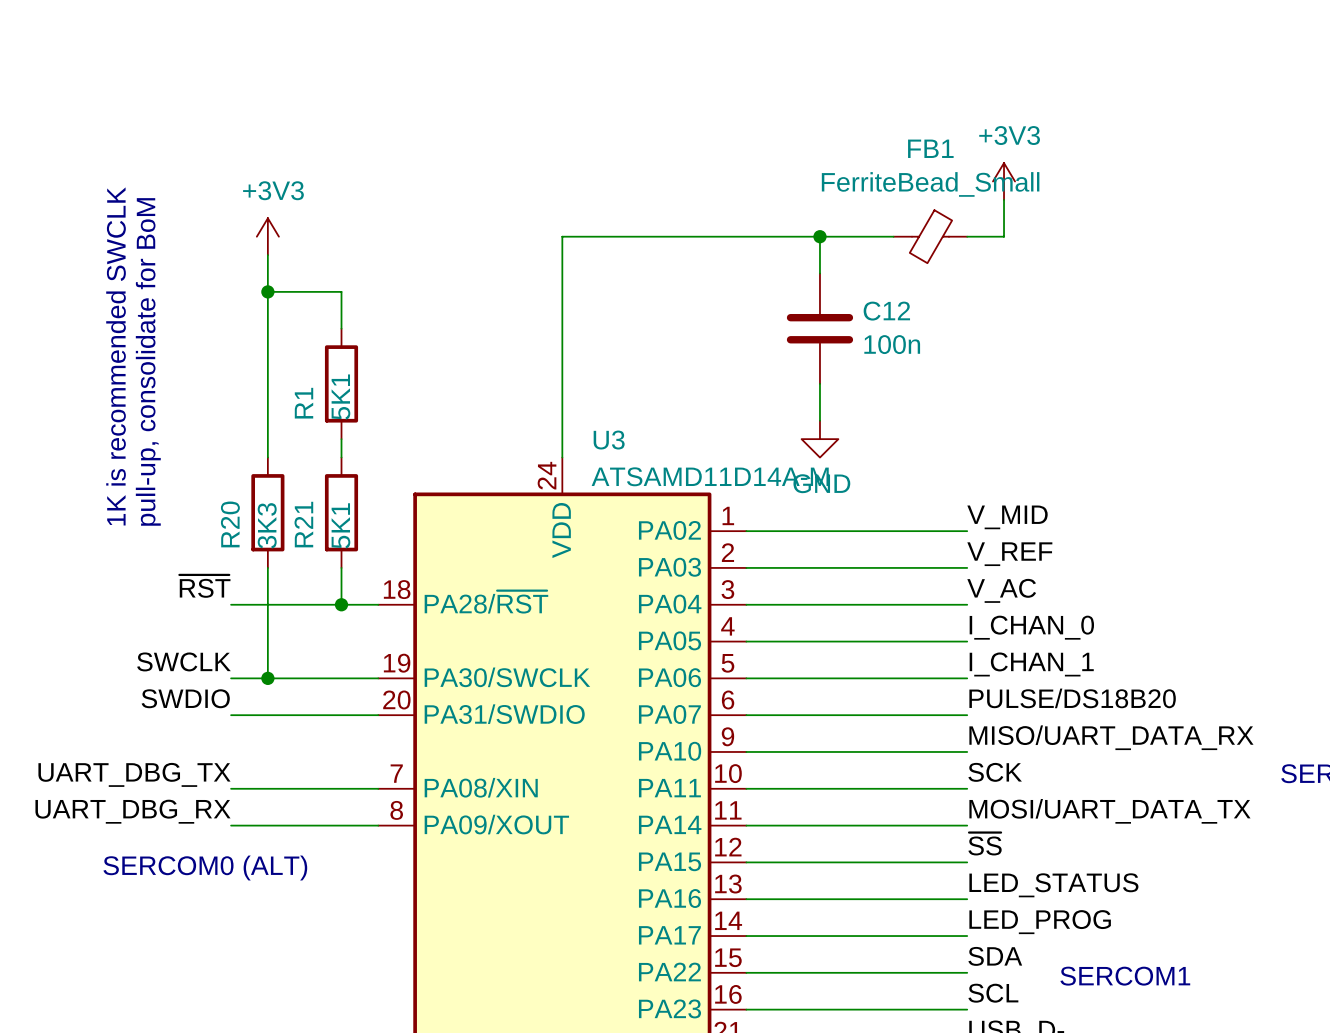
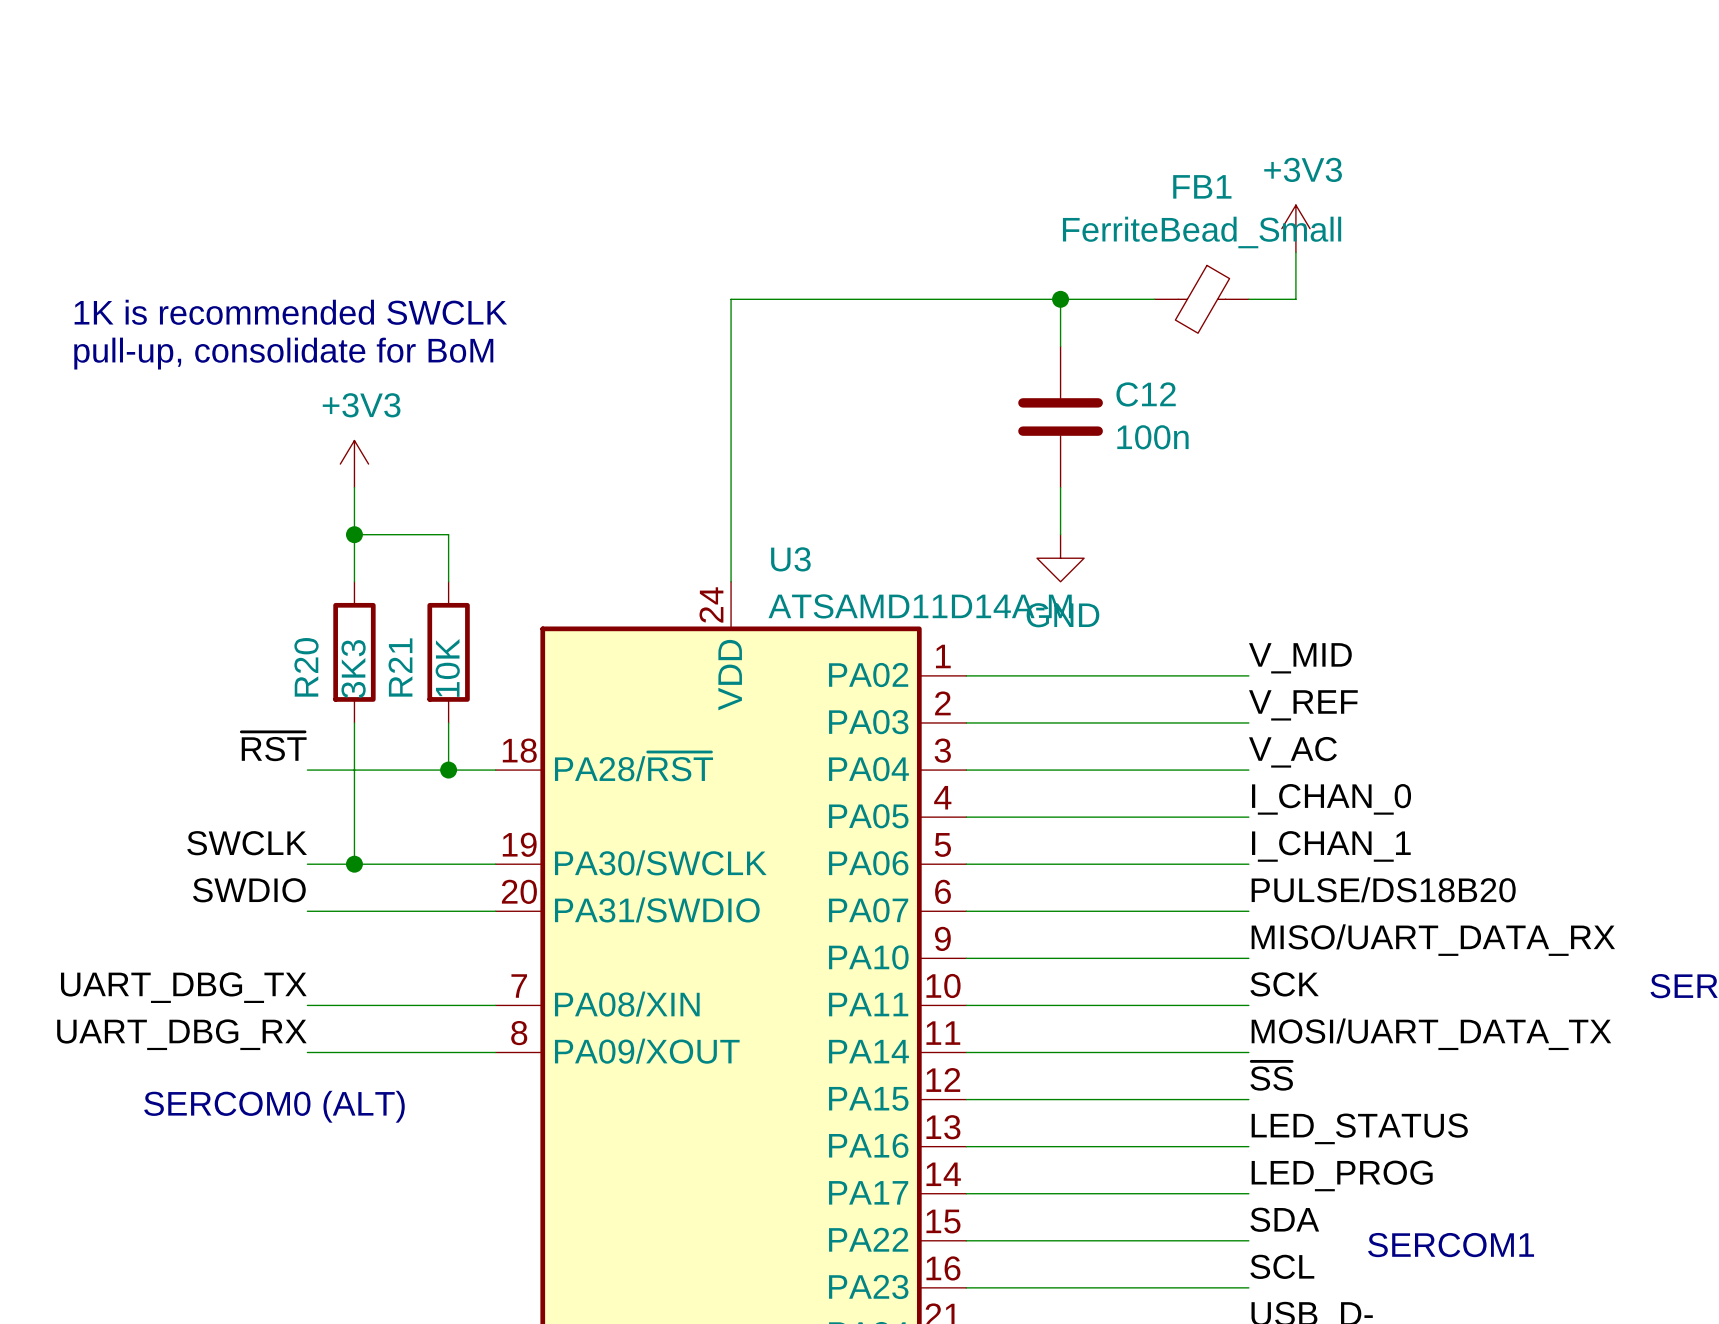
power symbol position: +3V3 (267, 236) -> +3V3 (354, 464)
wire: (267, 255) (267, 383) -> none
wire: (267, 291) (341, 291) (341, 328) -> none
junction: (267, 291) -> none
text rotation: 0° (116, 356) -> 90° clockwise (290, 312)
text rotation: 0° (148, 361) -> 90° clockwise (283, 353)
R1: 5K1 (341, 383) -> none
wire: none -> (354, 534) (448, 534) (448, 558)
junction: none -> (354, 534)
R21 value: 5K1 (340, 525) -> 10K (447, 667)

